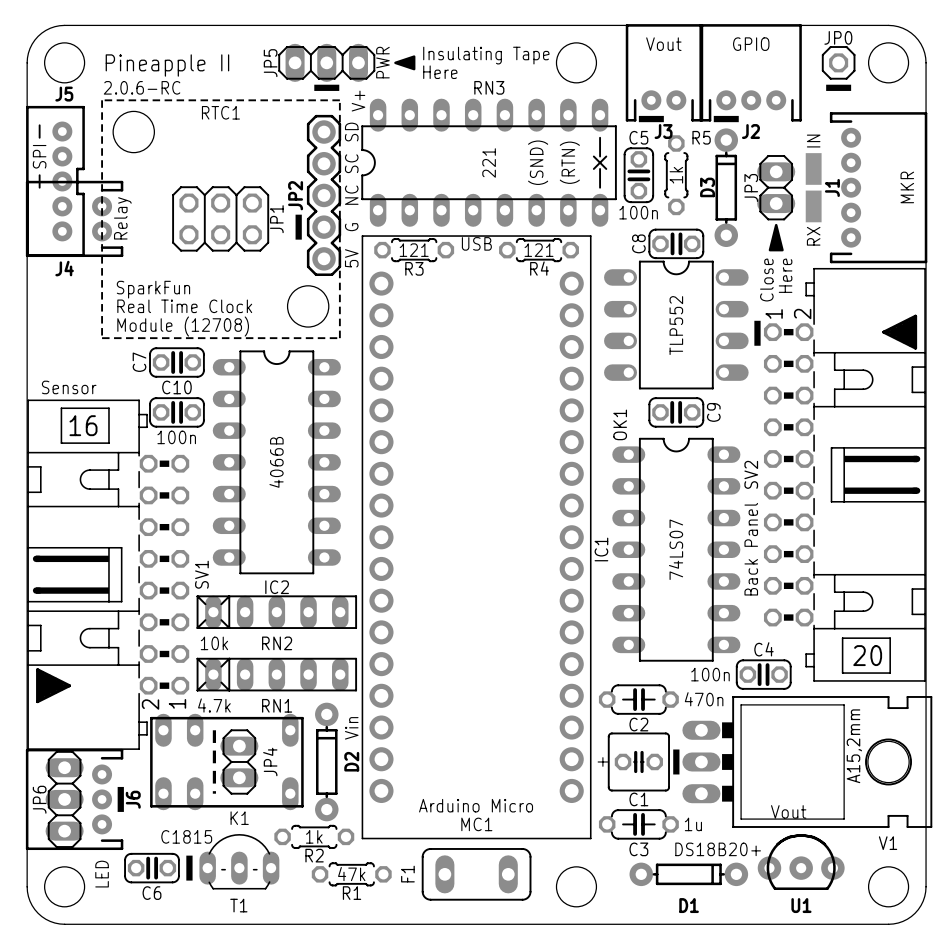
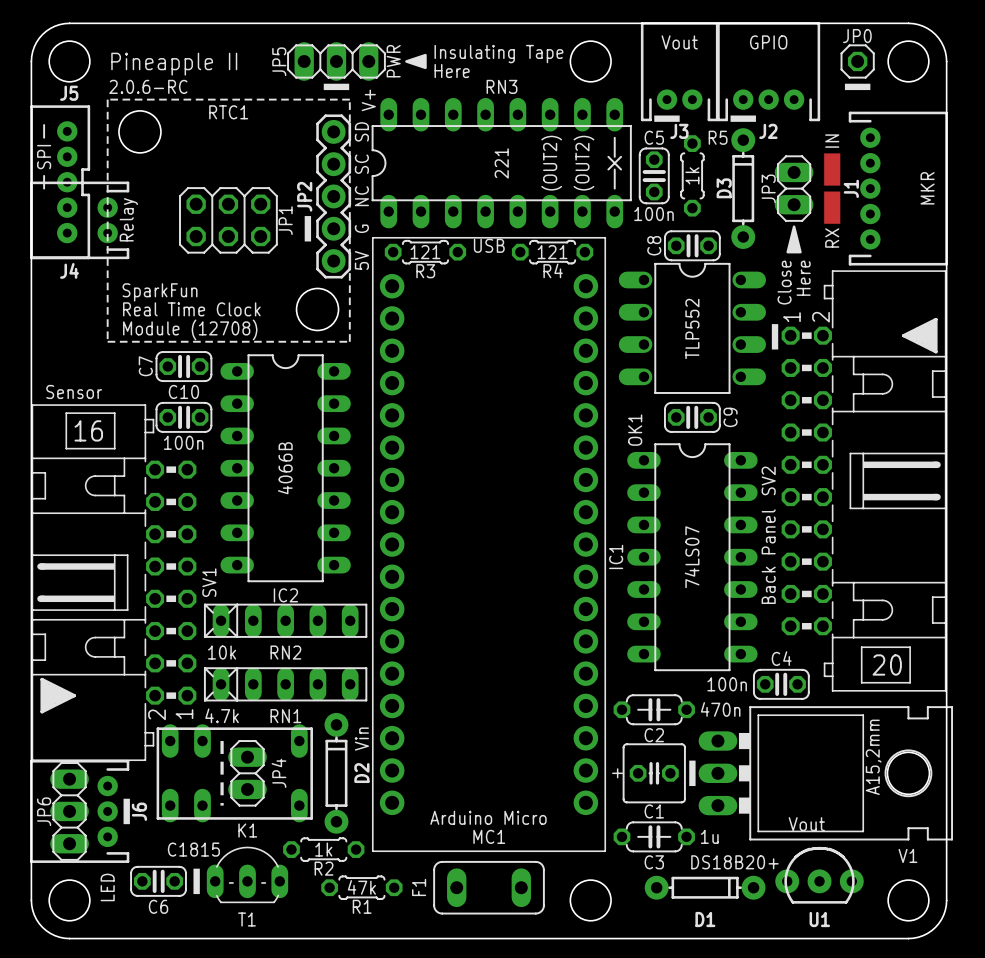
text: (SND) (538, 162) -> (OUT2) (551, 163)
text: (RTN) (569, 162) -> (OUT2) (583, 163)

